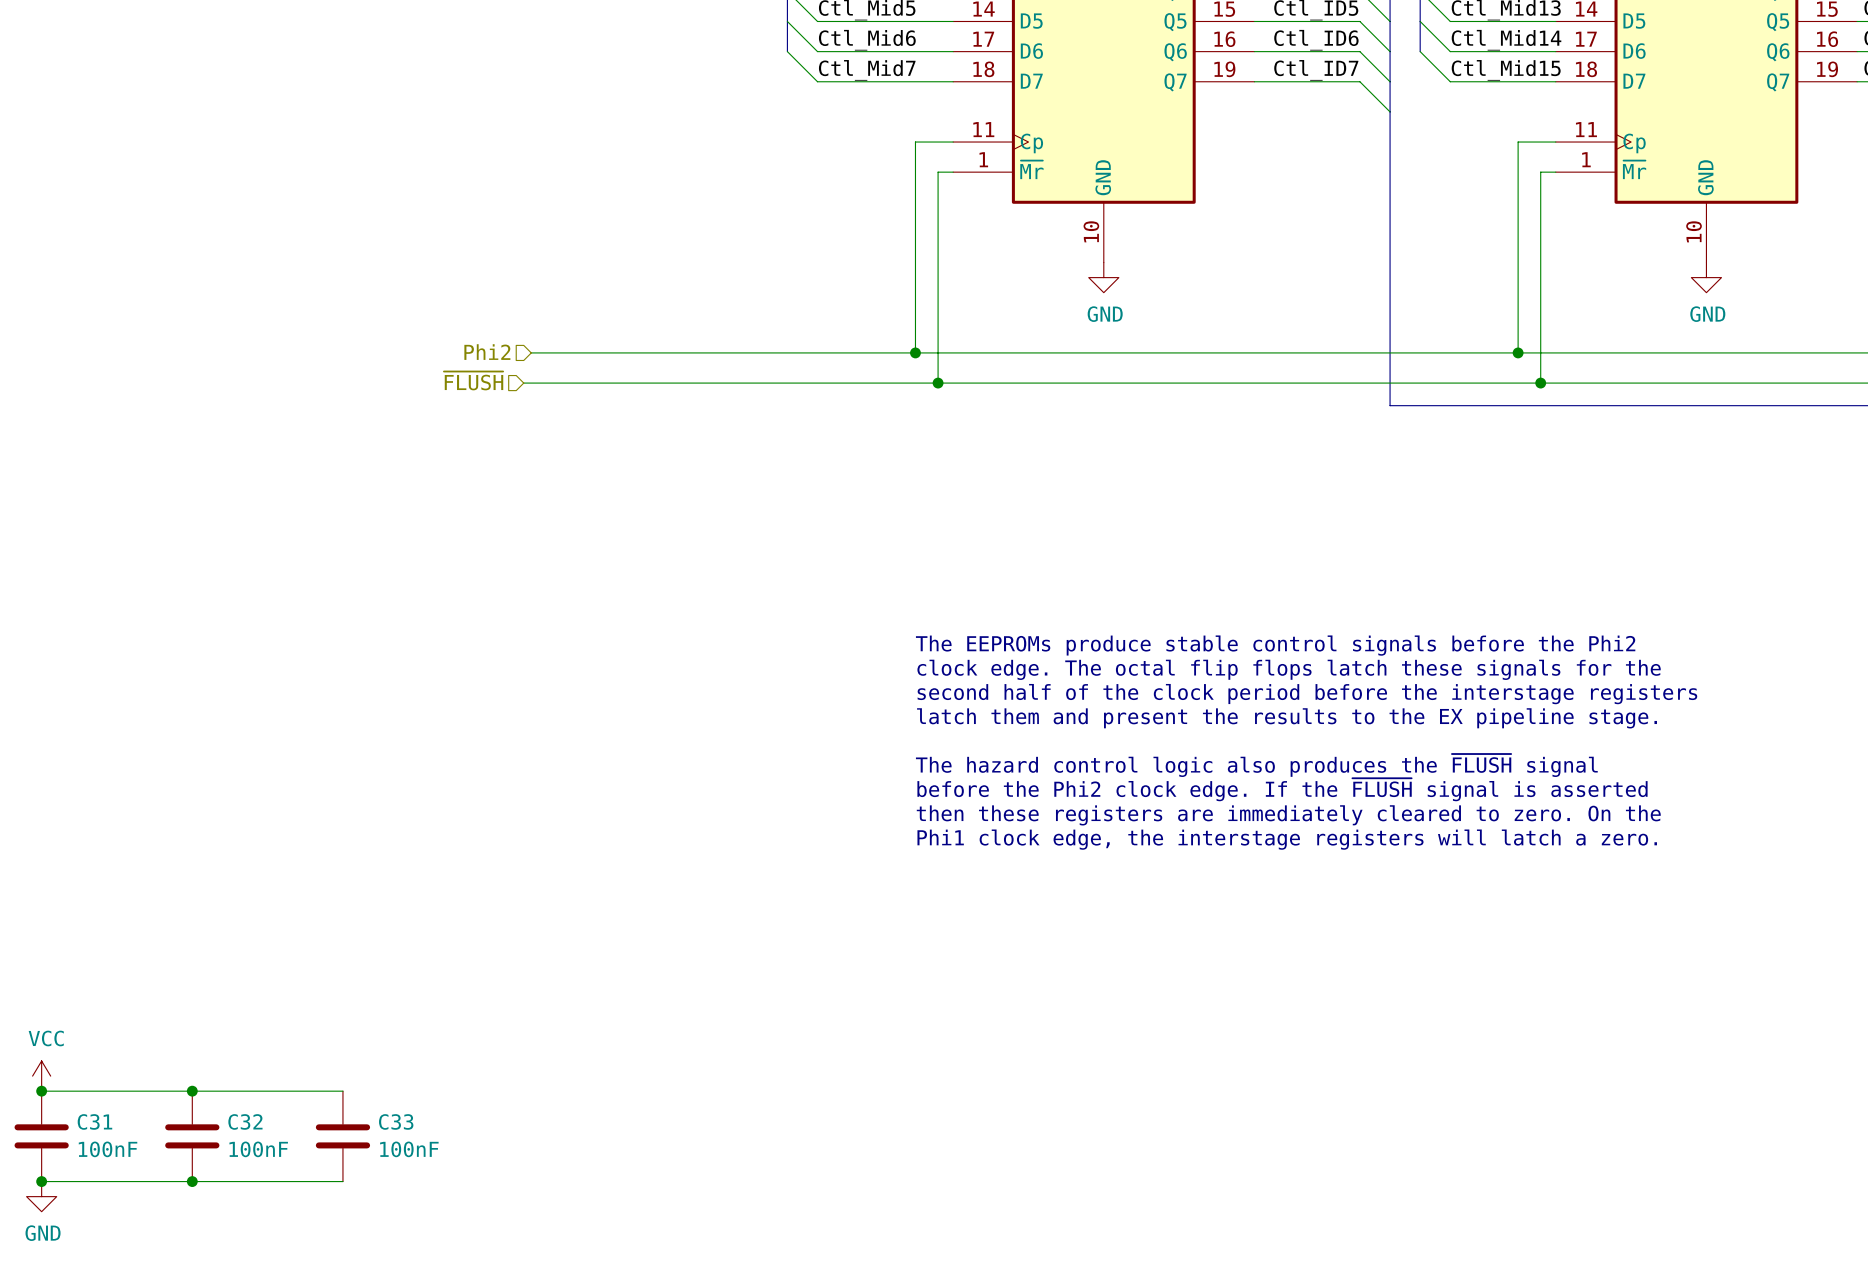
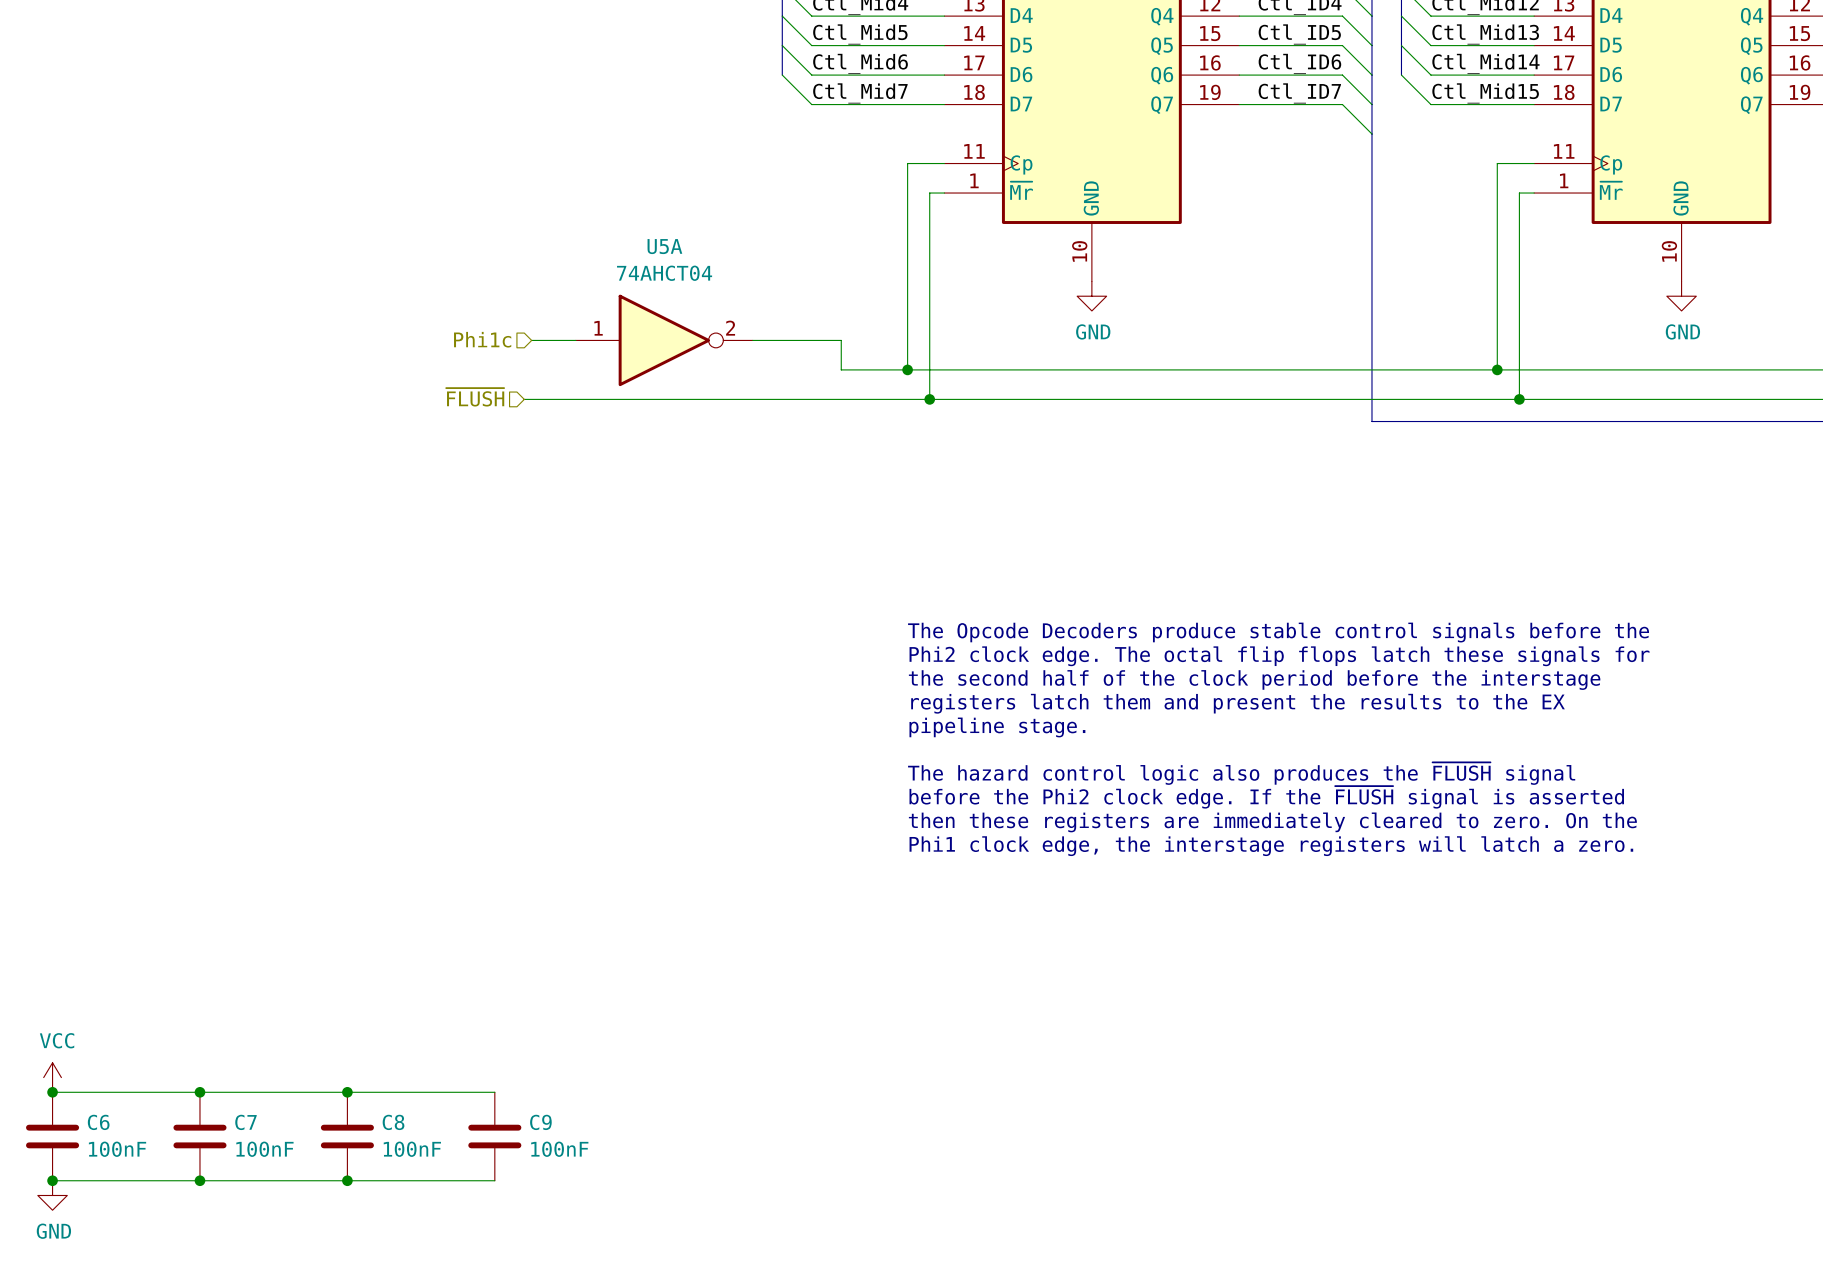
wire: none -> (531, 340) (575, 340)
U5A: none -> 74AHCT04 (664, 340)
hierarchical label: Phi2 (487, 352) -> Phi1c (482, 339)
wire: (531, 352) (847, 352) -> (752, 340) (841, 340) (841, 369)
text: none -> The Opcode Decoders produce stable control signals before the (1278, 632)
text: The EEPROMs produce stable control signals before the Phi2 (1275, 645) -> Phi2 clock edge. The octal flip flops latch these signals for (1279, 656)
text: clock edge. The octal flip flops latch these signals for the (1289, 669) -> the second half of the clock period before the interstage (1254, 680)
text: second half of the clock period before the interstage registers (1307, 694) -> registers latch them and present the results to the EX (1238, 703)
text: latch them and present the results to the EX pipeline stage. (1287, 718) -> pipeline stage. (997, 727)
wire: none -> (347, 1092) (494, 1092)
junction: none -> (347, 1092)
C31 name: C31 (94, 1121) -> C6 (98, 1122)
C32 name: C32 (245, 1121) -> C7 (245, 1122)
C33 name: C33 (396, 1121) -> C8 (393, 1122)
C9: none -> 100nF (494, 1136)
wire: none -> (347, 1180) (494, 1180)
junction: none -> (347, 1180)

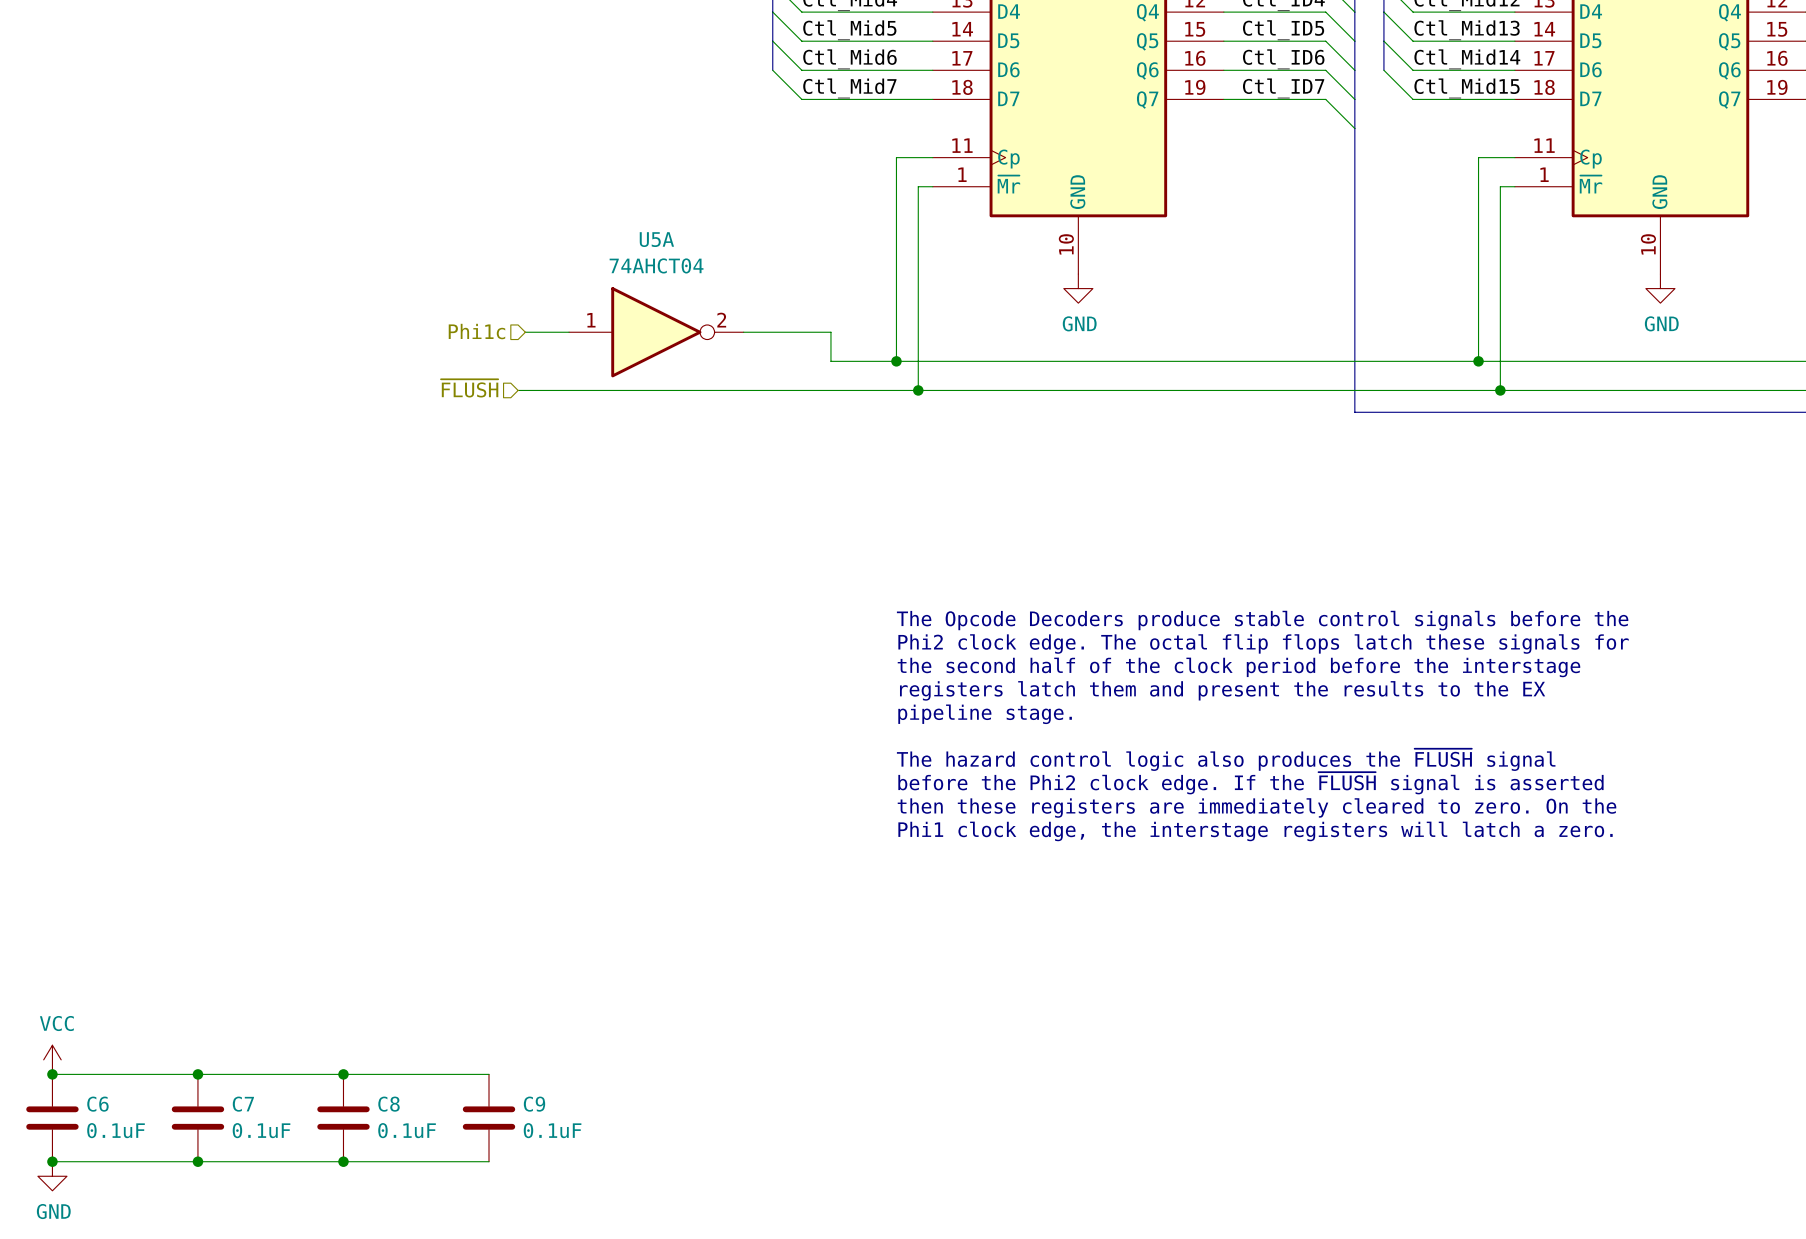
C6 value: 100nF (117, 1149) -> 0.1uF (116, 1130)
C7 value: 100nF (264, 1149) -> 0.1uF (261, 1130)
C8 value: 100nF (412, 1149) -> 0.1uF (407, 1130)
C9 value: 100nF (559, 1149) -> 0.1uF (552, 1130)

